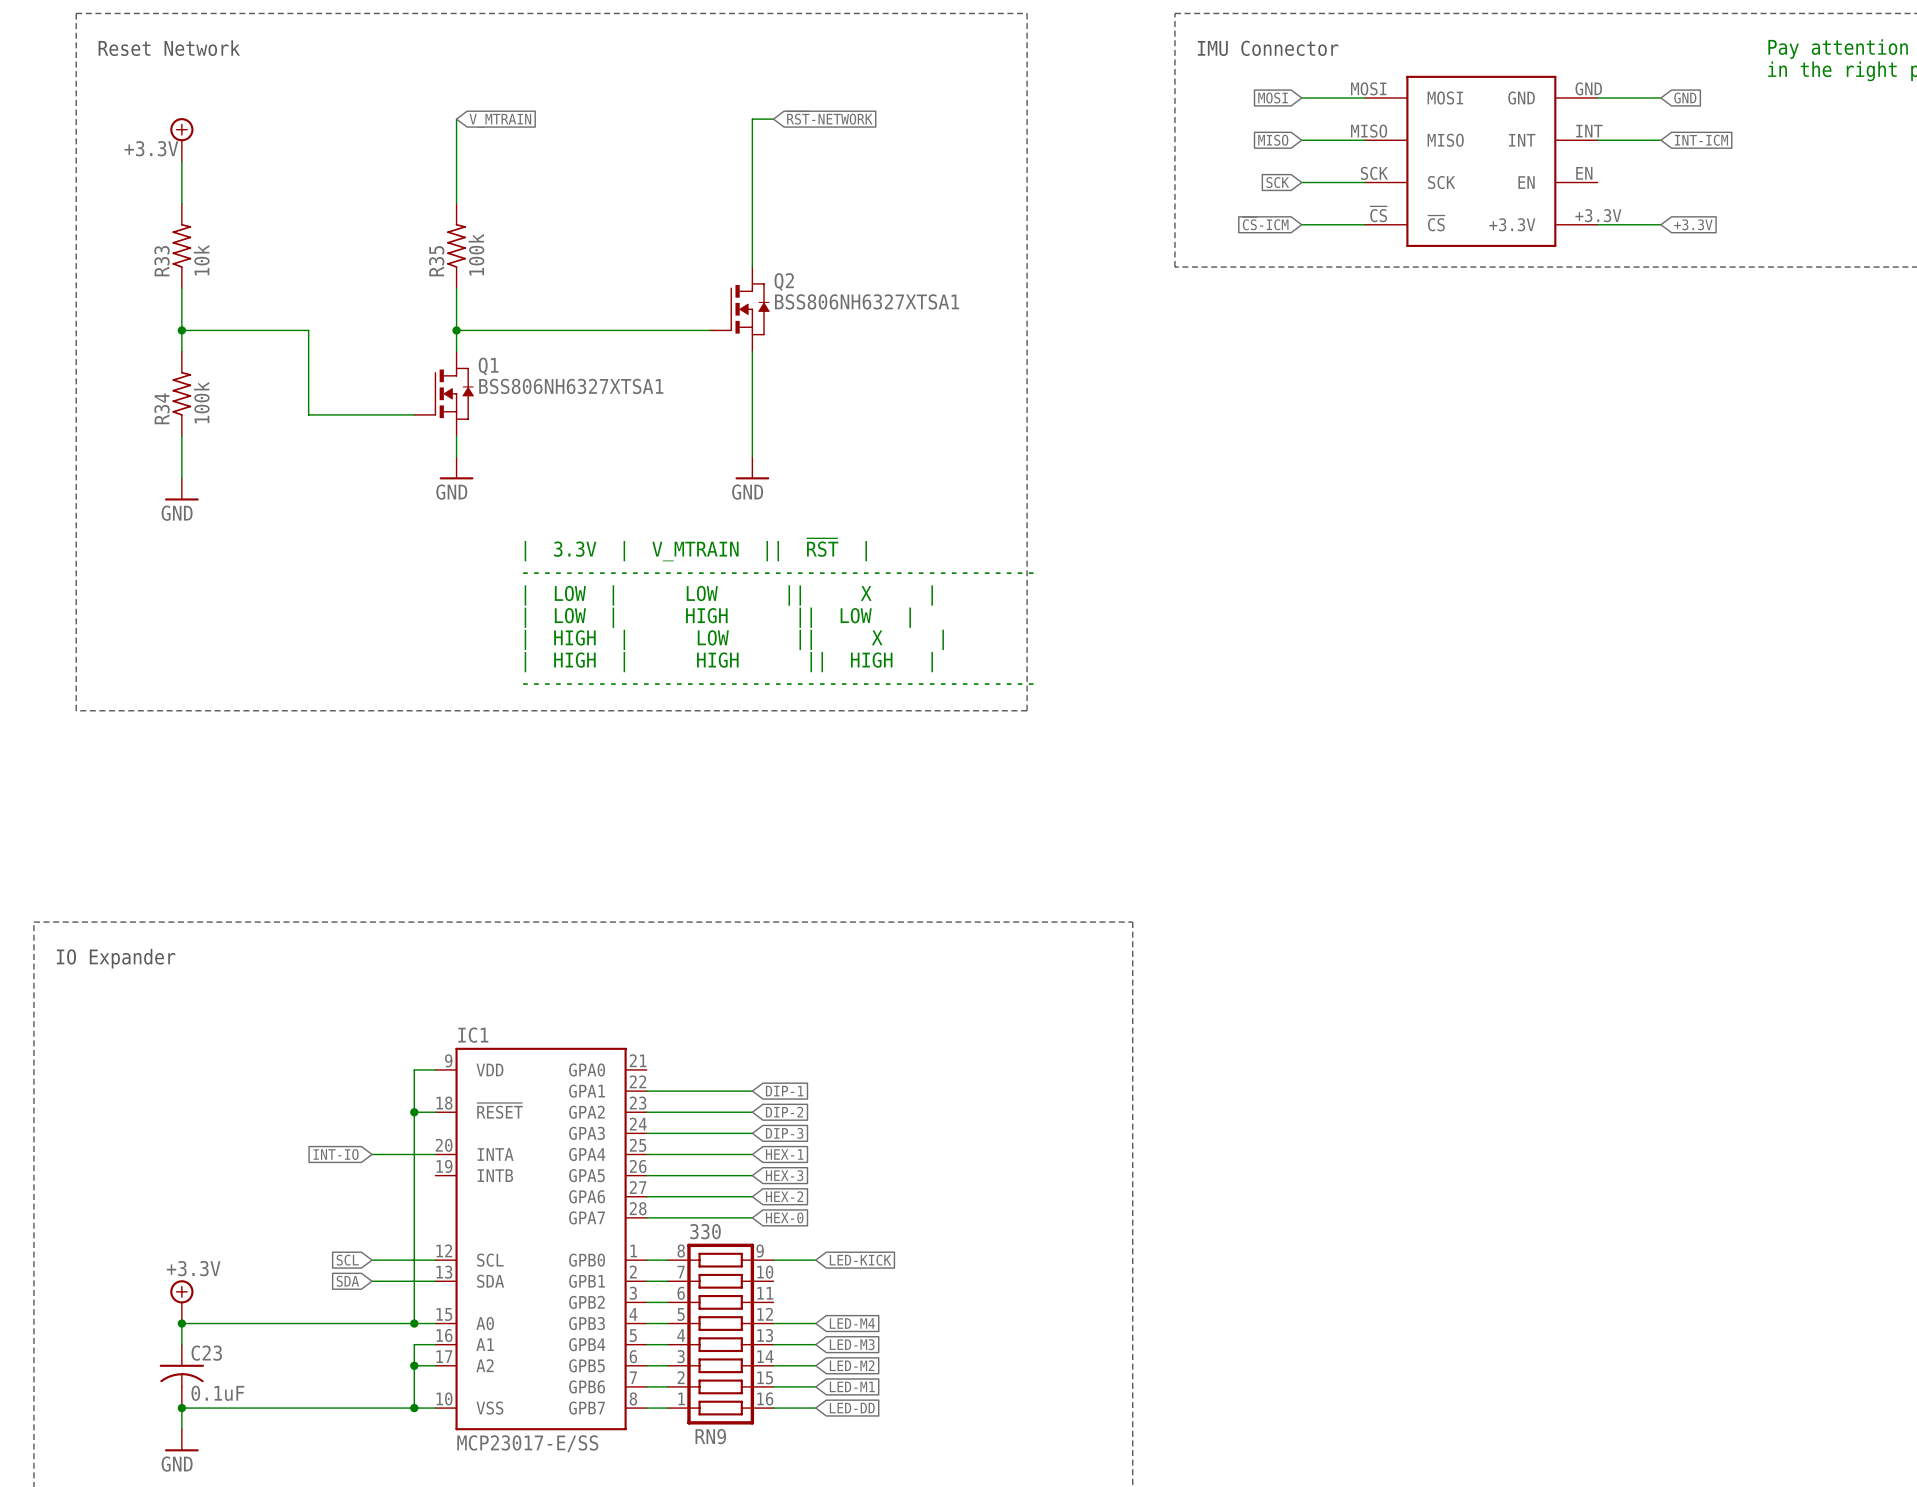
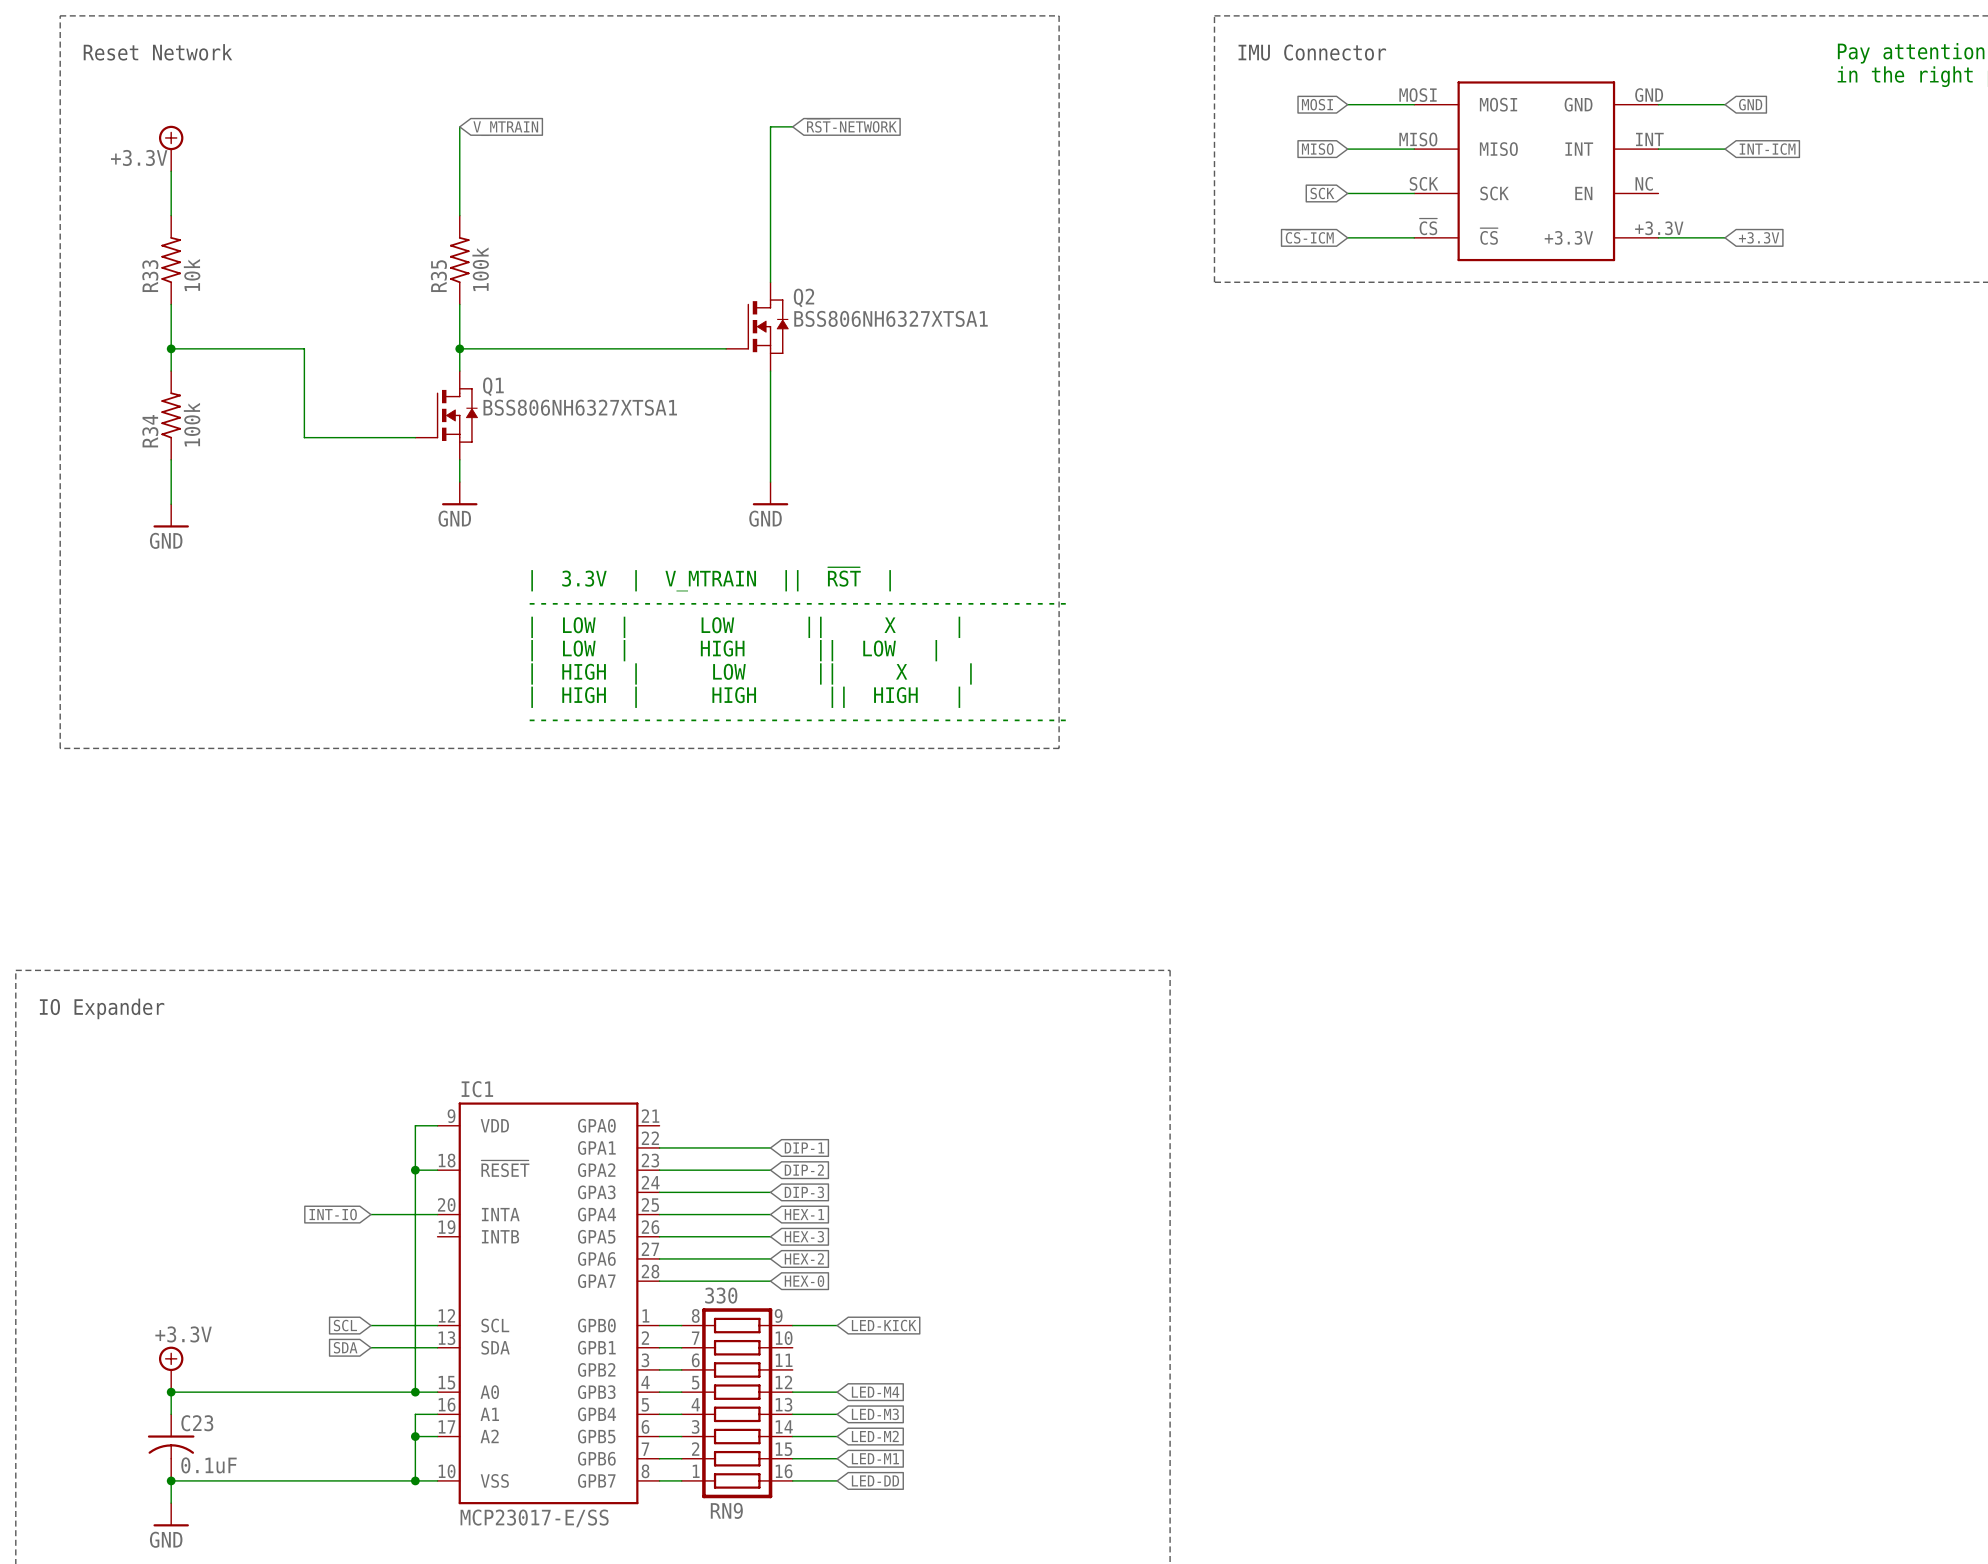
part pin number: EN (1584, 173) -> NC (1644, 183)

